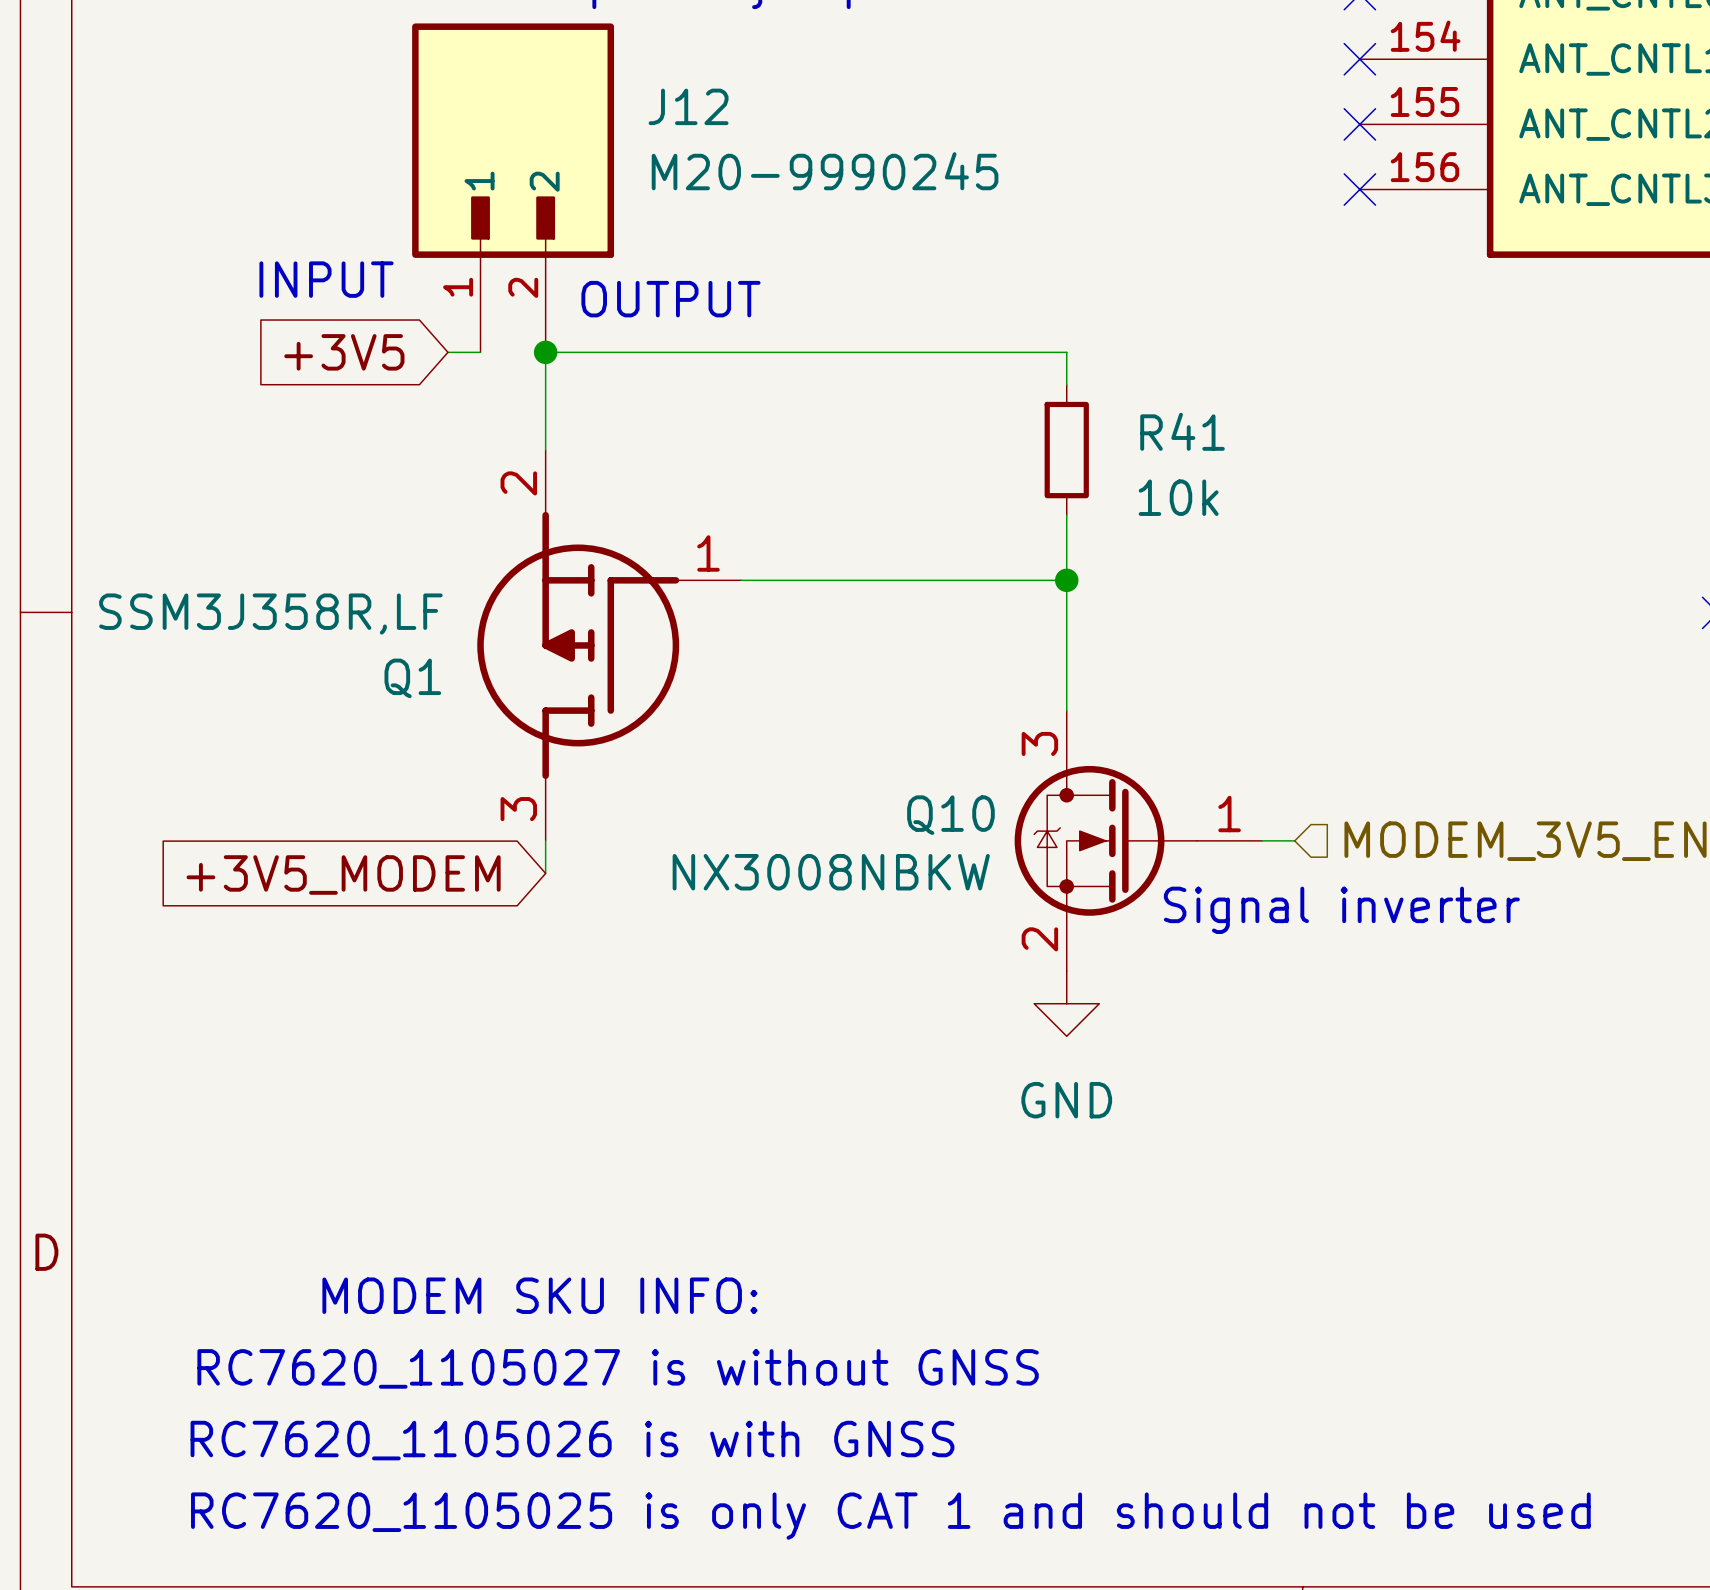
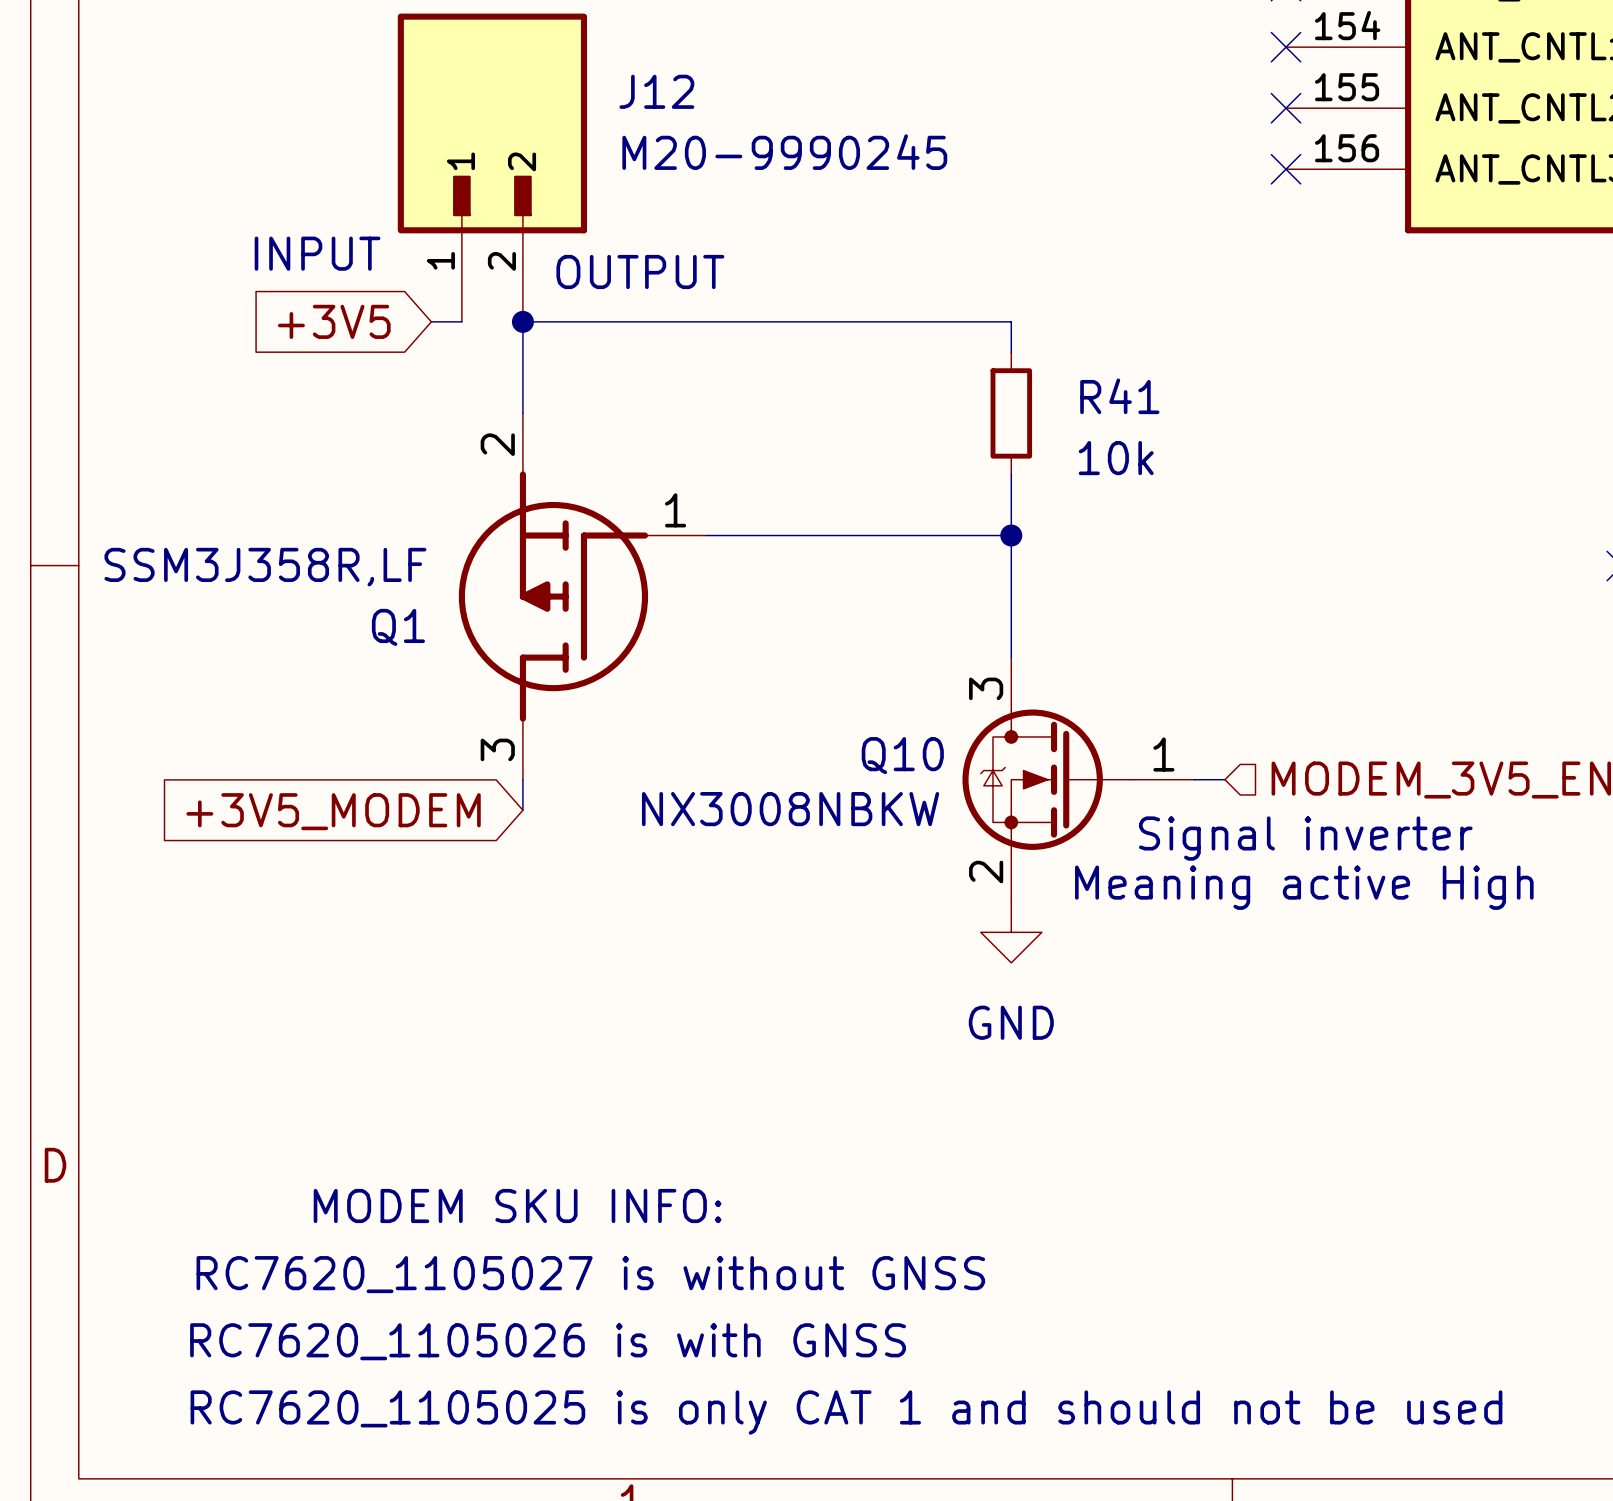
text position: Signal inverter (1341, 910) -> Signal inverter (1305, 838)
text: none -> Meaning active High (1304, 887)

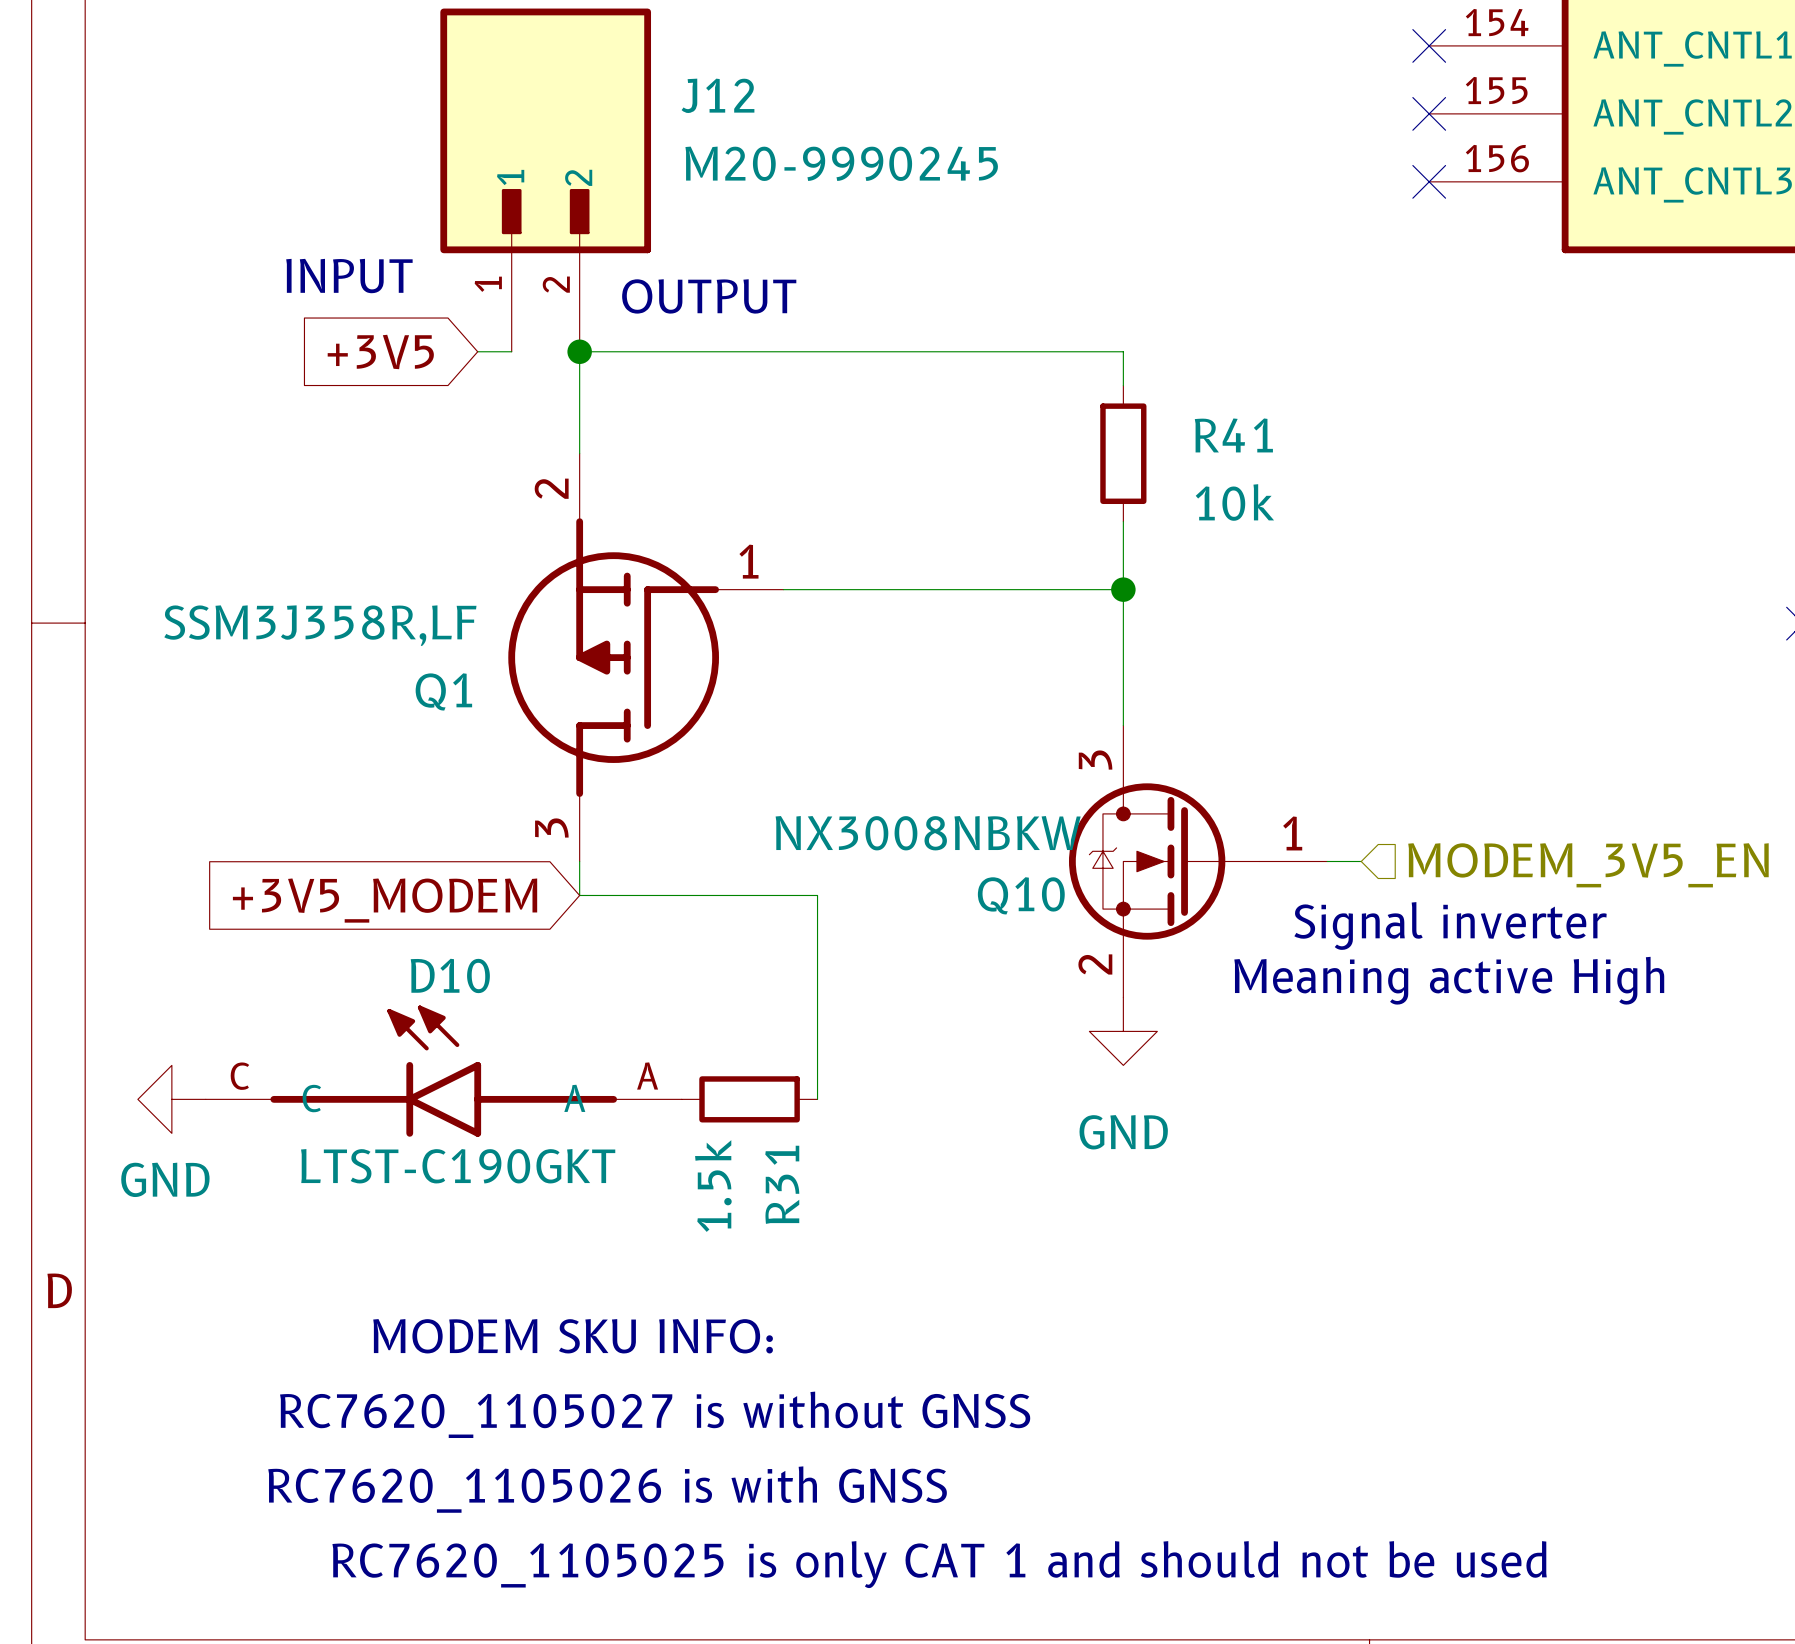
Q10 name position: Q10 (902, 755) -> Q10 (1021, 895)
Q10 value position: NX3008NBKW (790, 809) -> NX3008NBKW (928, 833)
wire: none -> (579, 895) (817, 895) (817, 1099)
D10: none -> LTST-C190GKT (443, 1071)
power symbol: none -> GND (171, 1099)
R31: none -> 1.5k (749, 1099)

